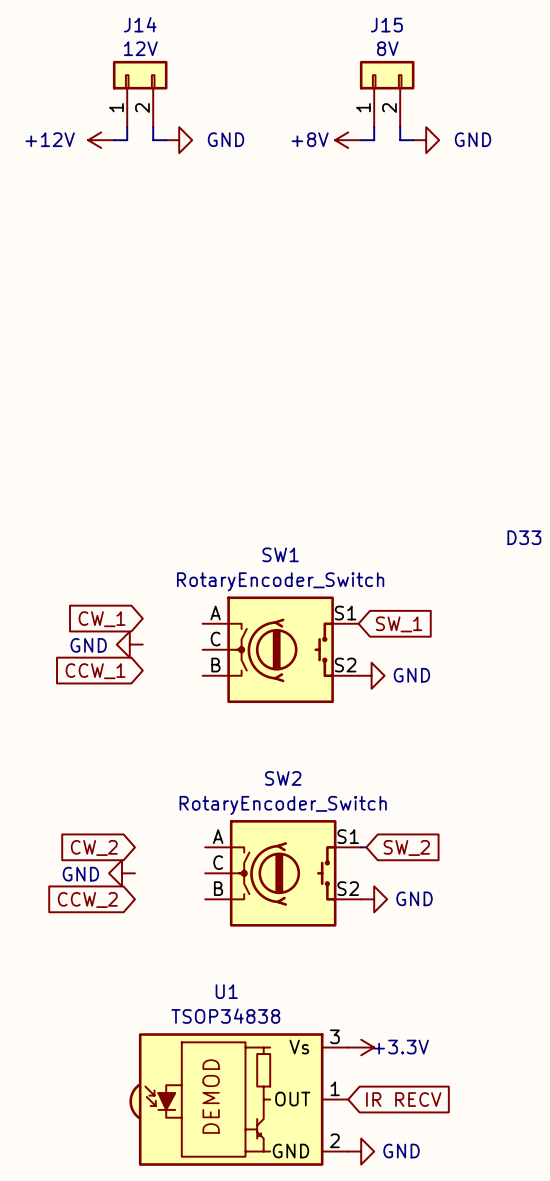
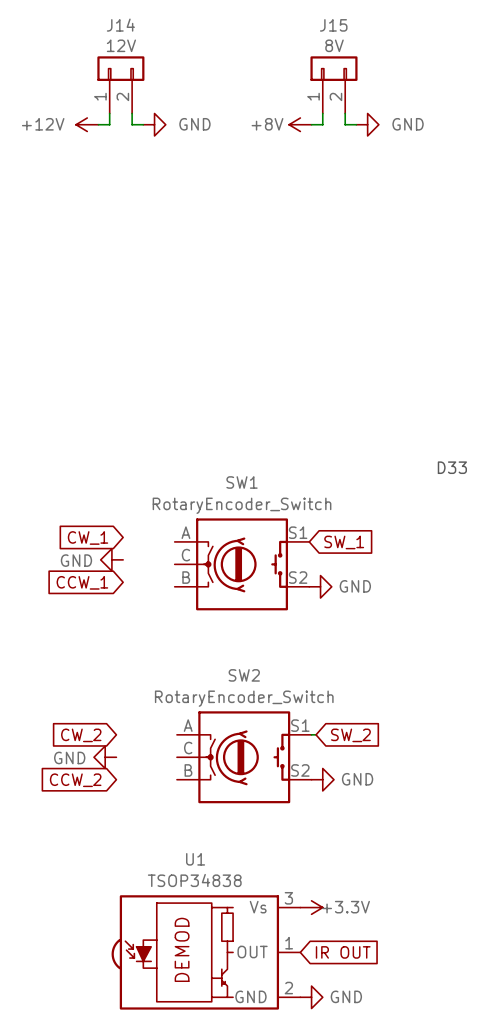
global label: IR RECV (403, 1099) -> IR OUT (343, 952)

